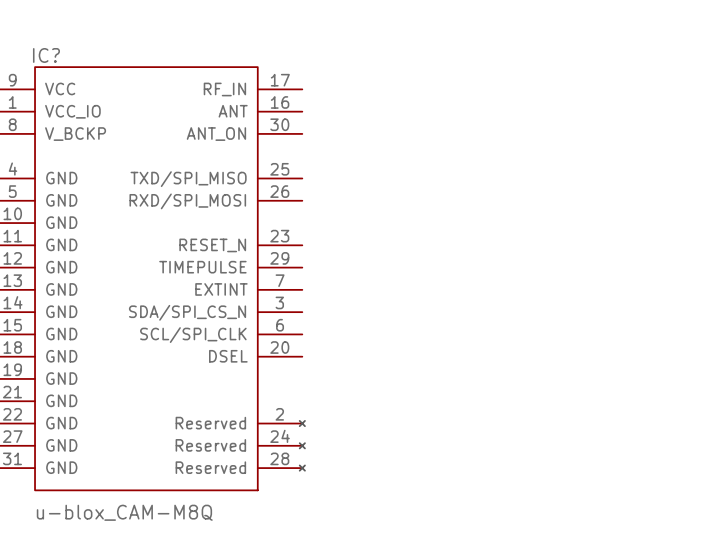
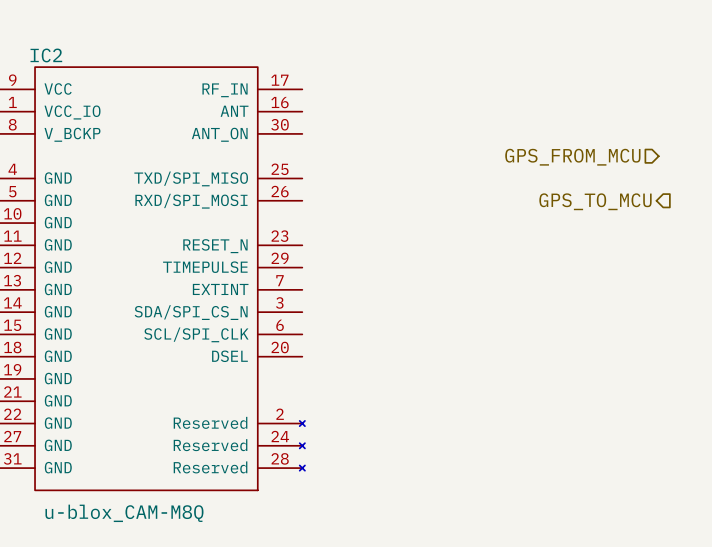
IC? name: IC? (46, 55) -> IC2 (46, 55)
hierarchical label: none -> GPS_FROM_MCU (572, 157)
hierarchical label: none -> GPS_TO_MCU (595, 201)

